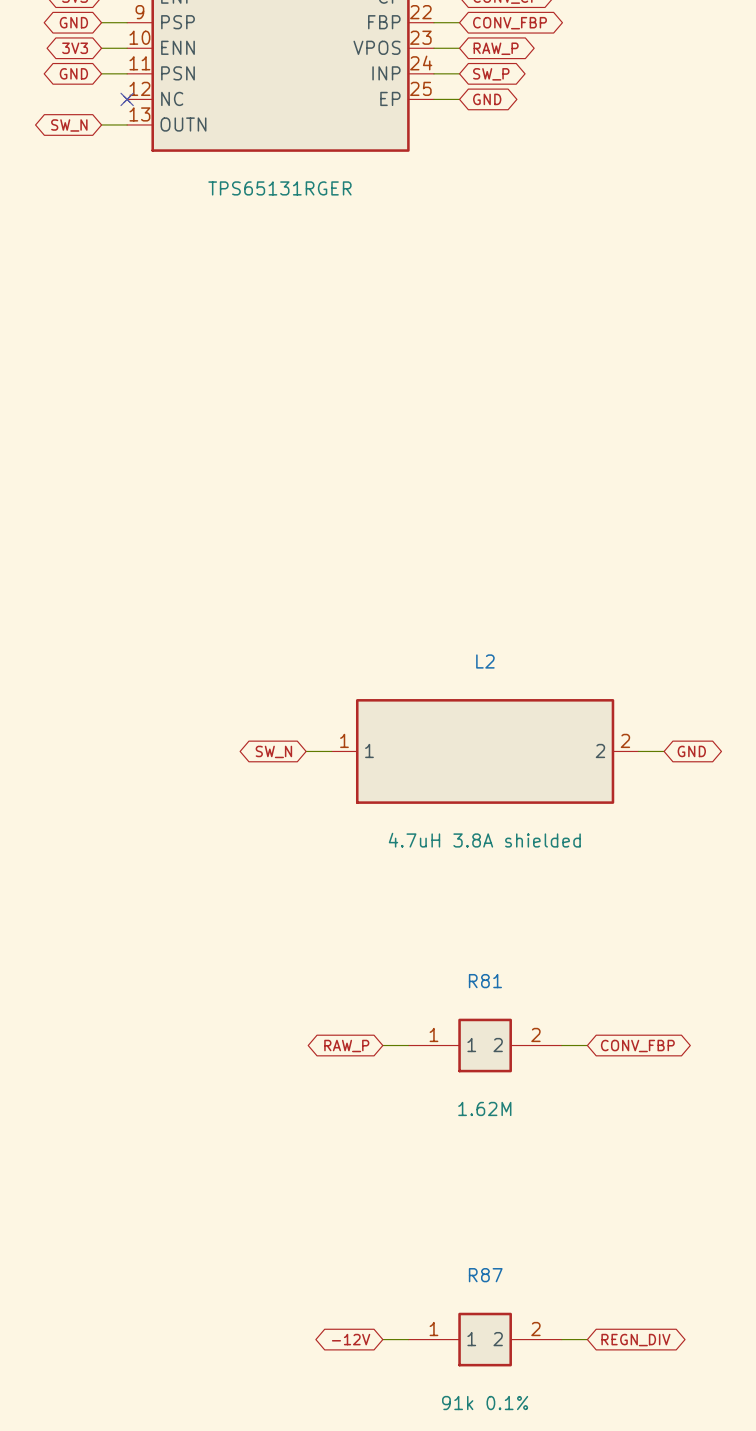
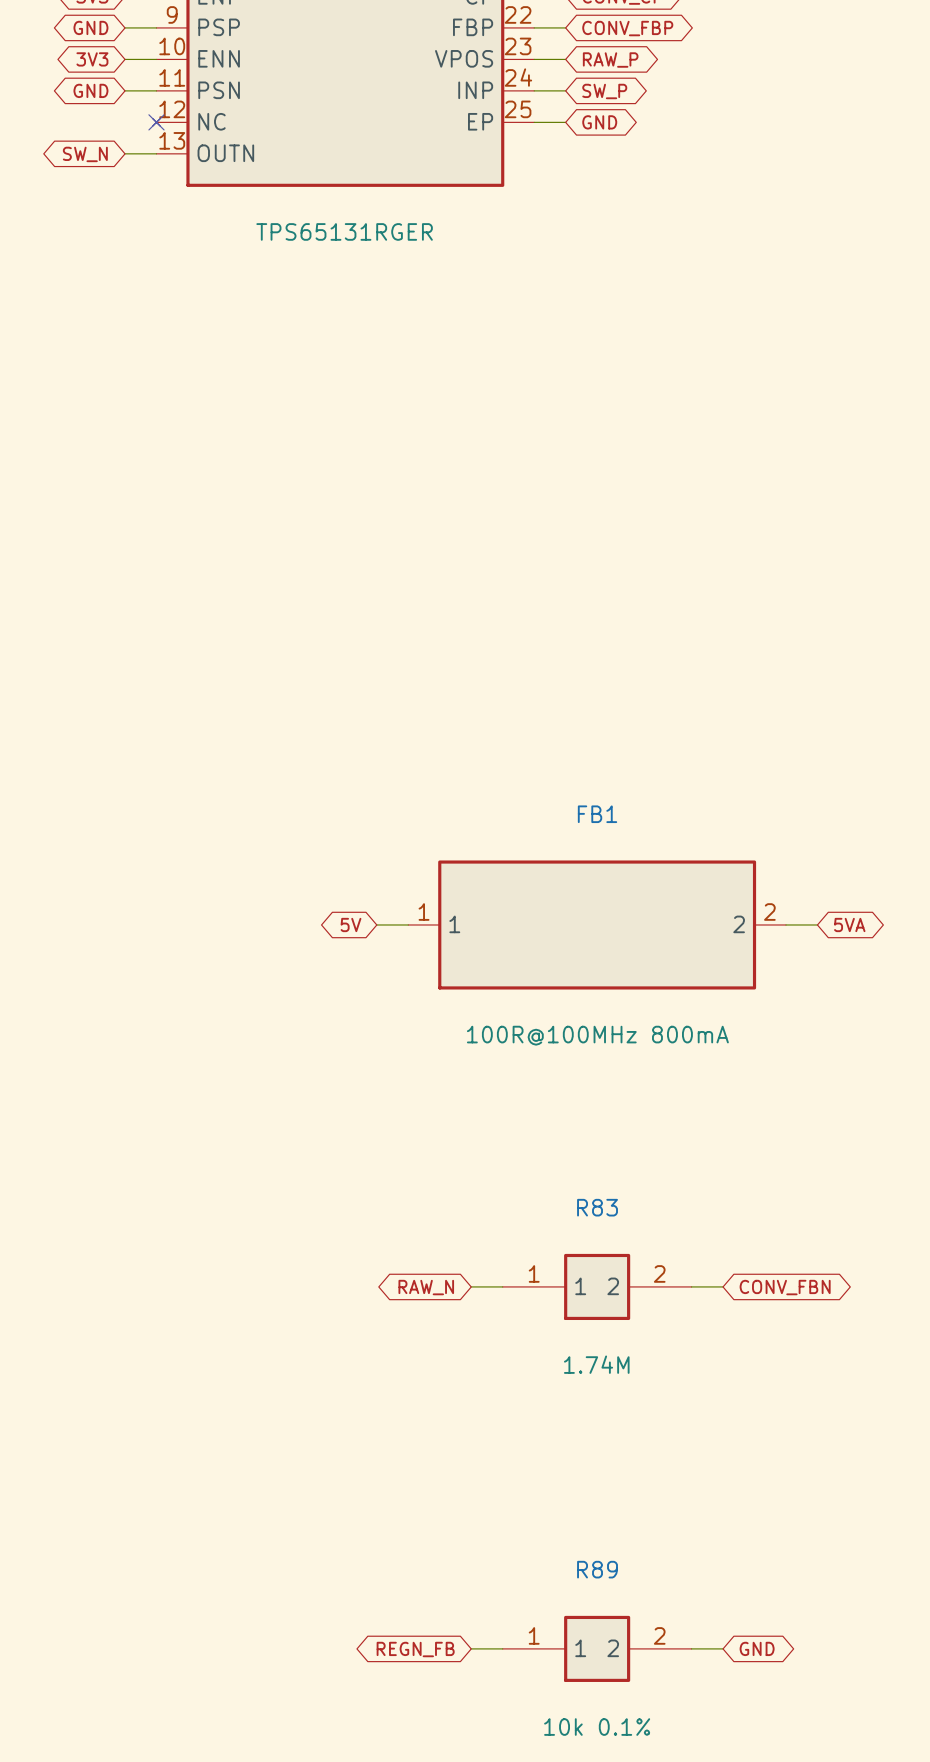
L2 name: L2 (485, 661) -> FB1 (597, 814)
global label: SW_N (273, 751) -> 5V (351, 924)
global label: GND (691, 751) -> 5VA (849, 924)
L2 value: 4.7uH 3.8A shielded (484, 840) -> 100R@100MHz 800mA (597, 1035)
R81 name: R81 (485, 981) -> R83 (597, 1207)
global label: RAW_P (346, 1046) -> RAW_N (426, 1287)
global label: CONV_FBP (637, 1046) -> CONV_FBN (785, 1287)
R81 value: 1.62M (484, 1108) -> 1.74M (596, 1364)
R87 name: R87 (485, 1275) -> R89 (597, 1569)
global label: -12V (351, 1339) -> REGN_FB (415, 1649)
global label: REGN_DIV (635, 1340) -> GND (757, 1648)
R87 value: 91k 0.1% (485, 1403) -> 10k 0.1% (597, 1727)

